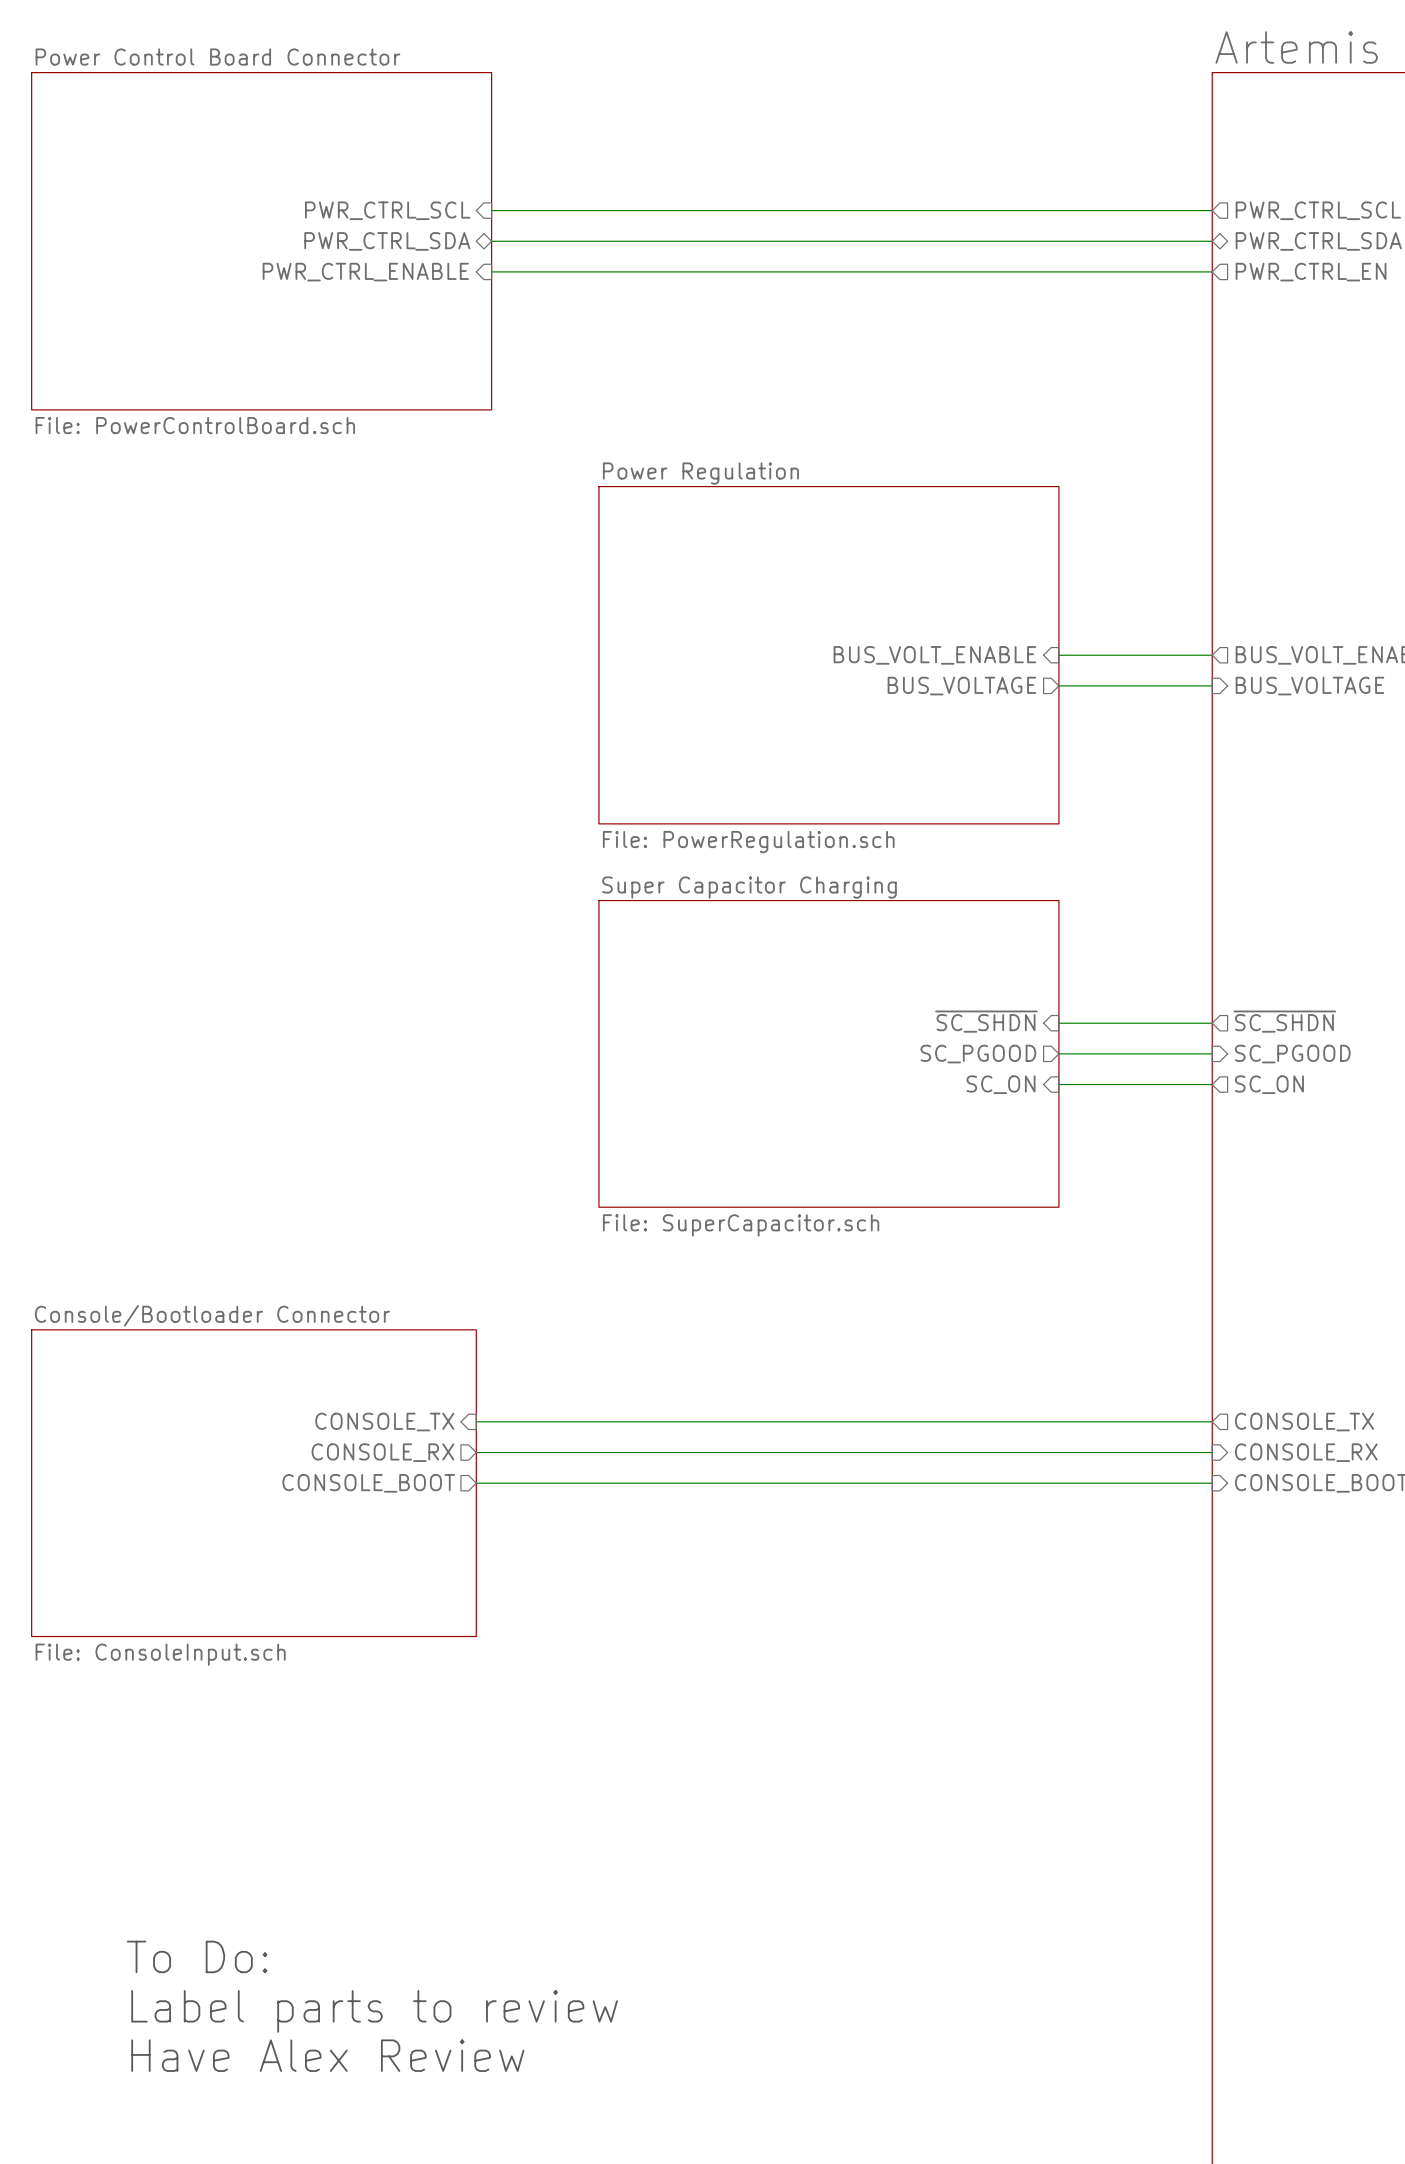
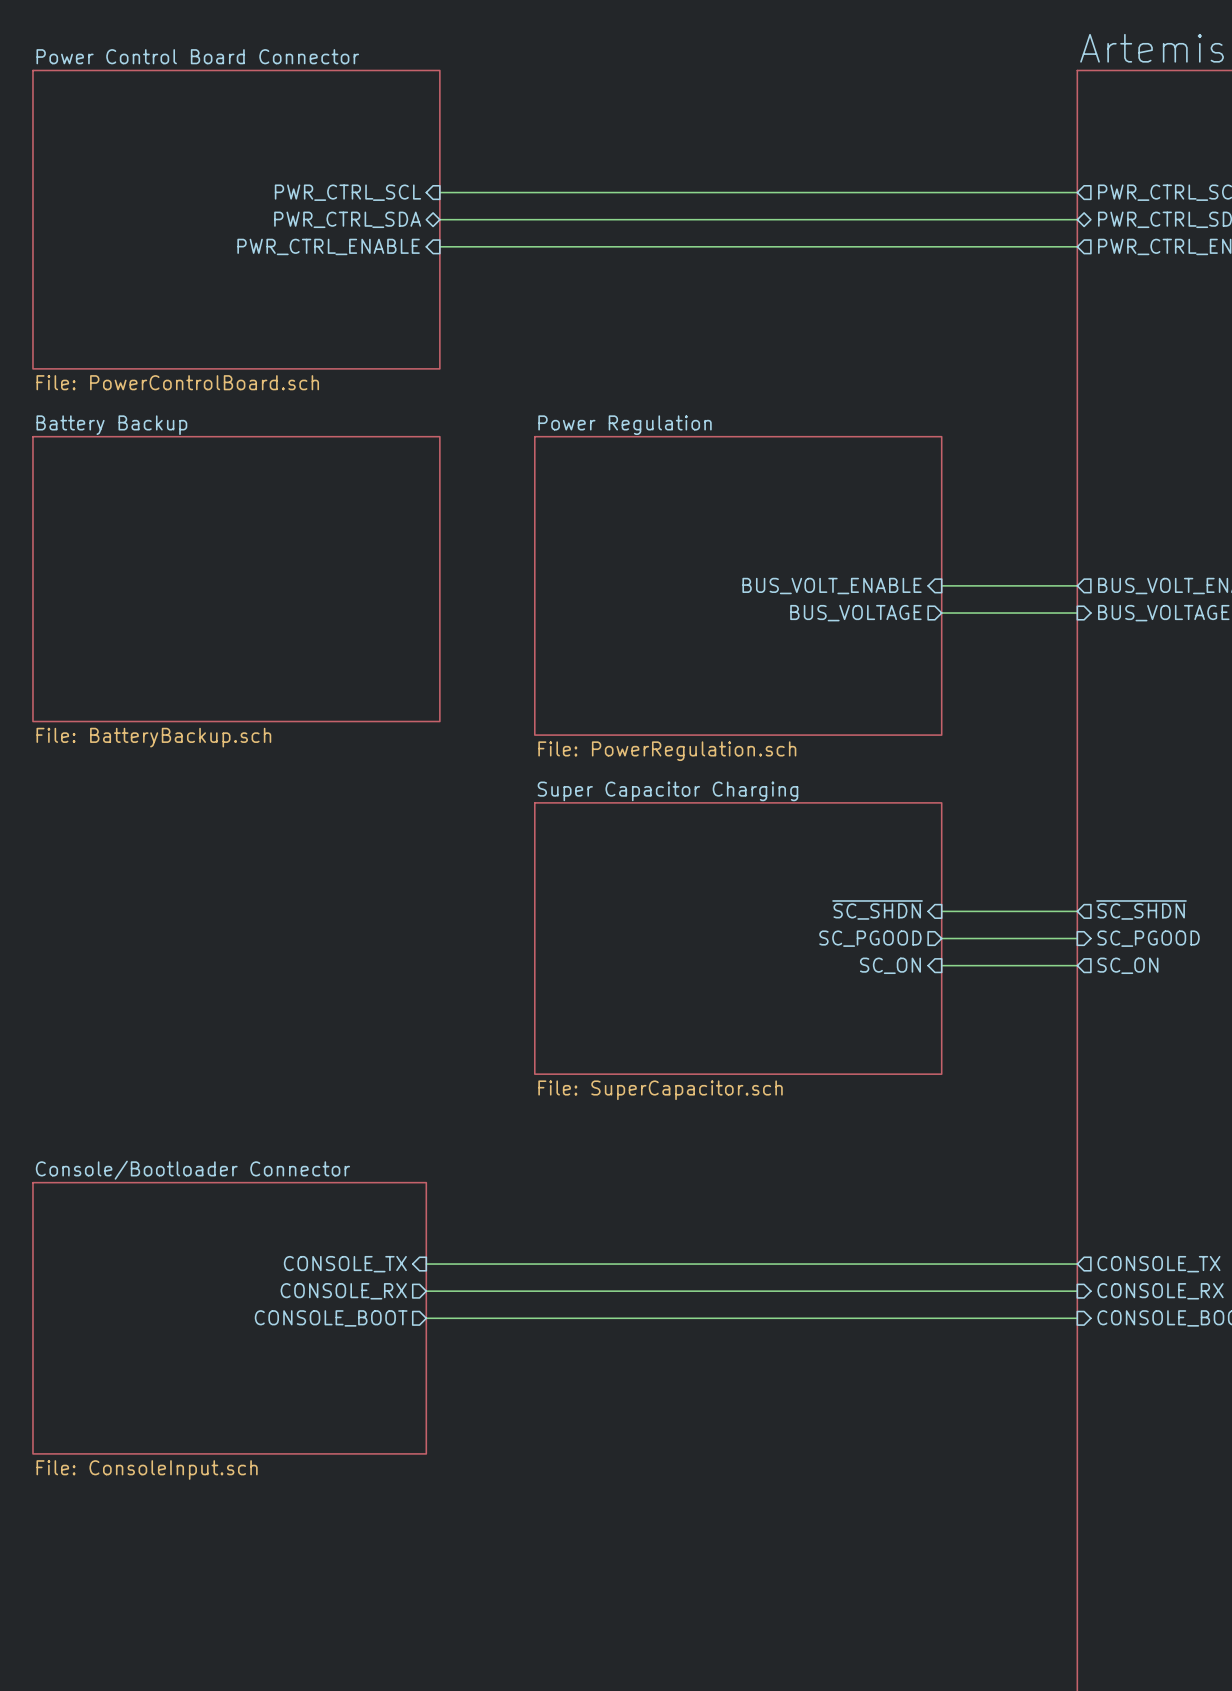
sheet Battery Backup: none -> File: BatteryBackup.sch (236, 579)

